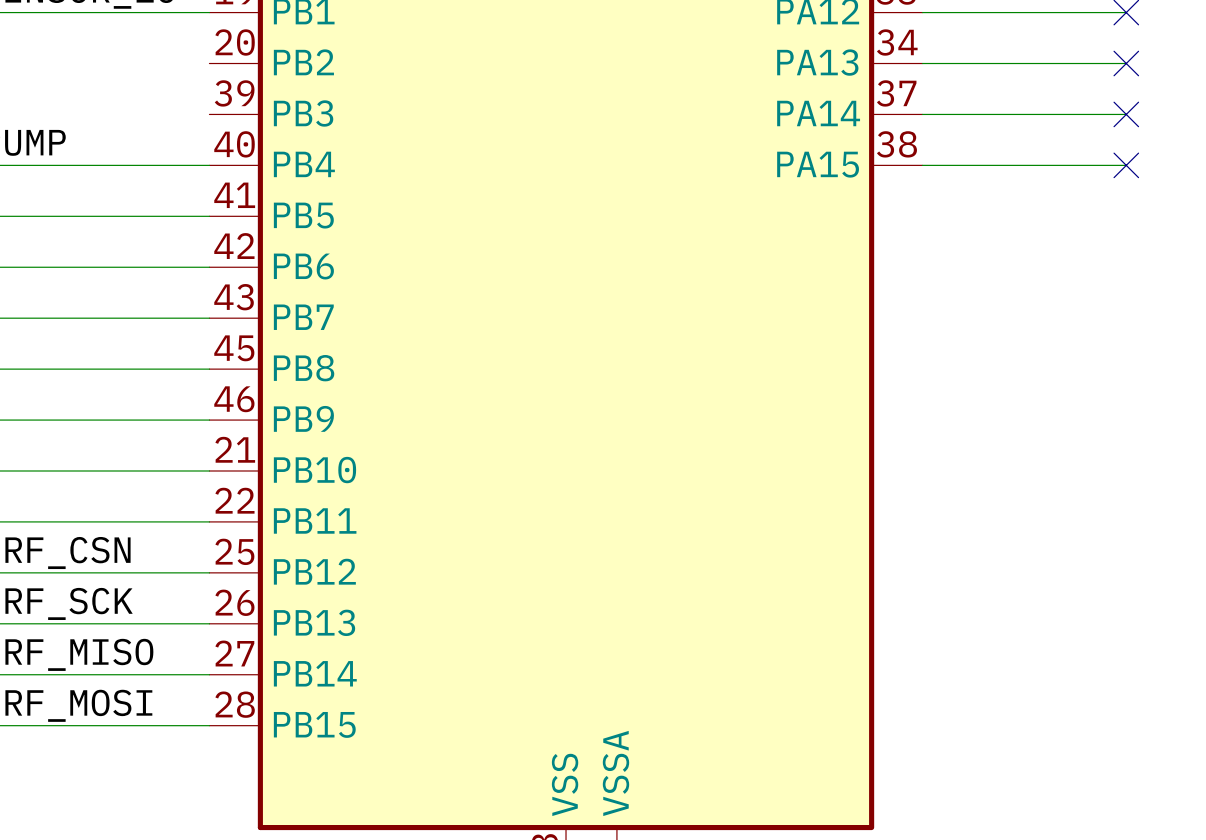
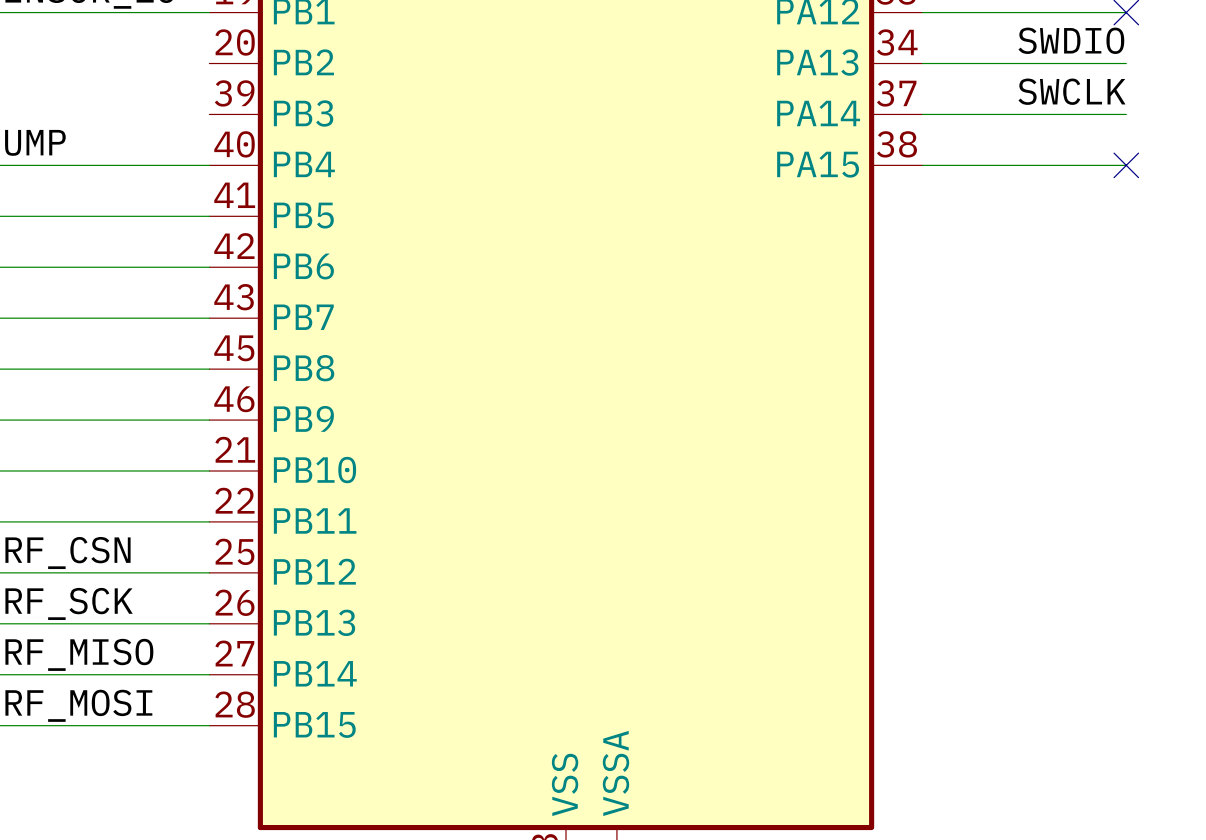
label: none -> SWDIO (1071, 40)
no-connect mark: (1126, 63) -> none
label: none -> SWCLK (1071, 91)
no-connect mark: (1126, 114) -> none

